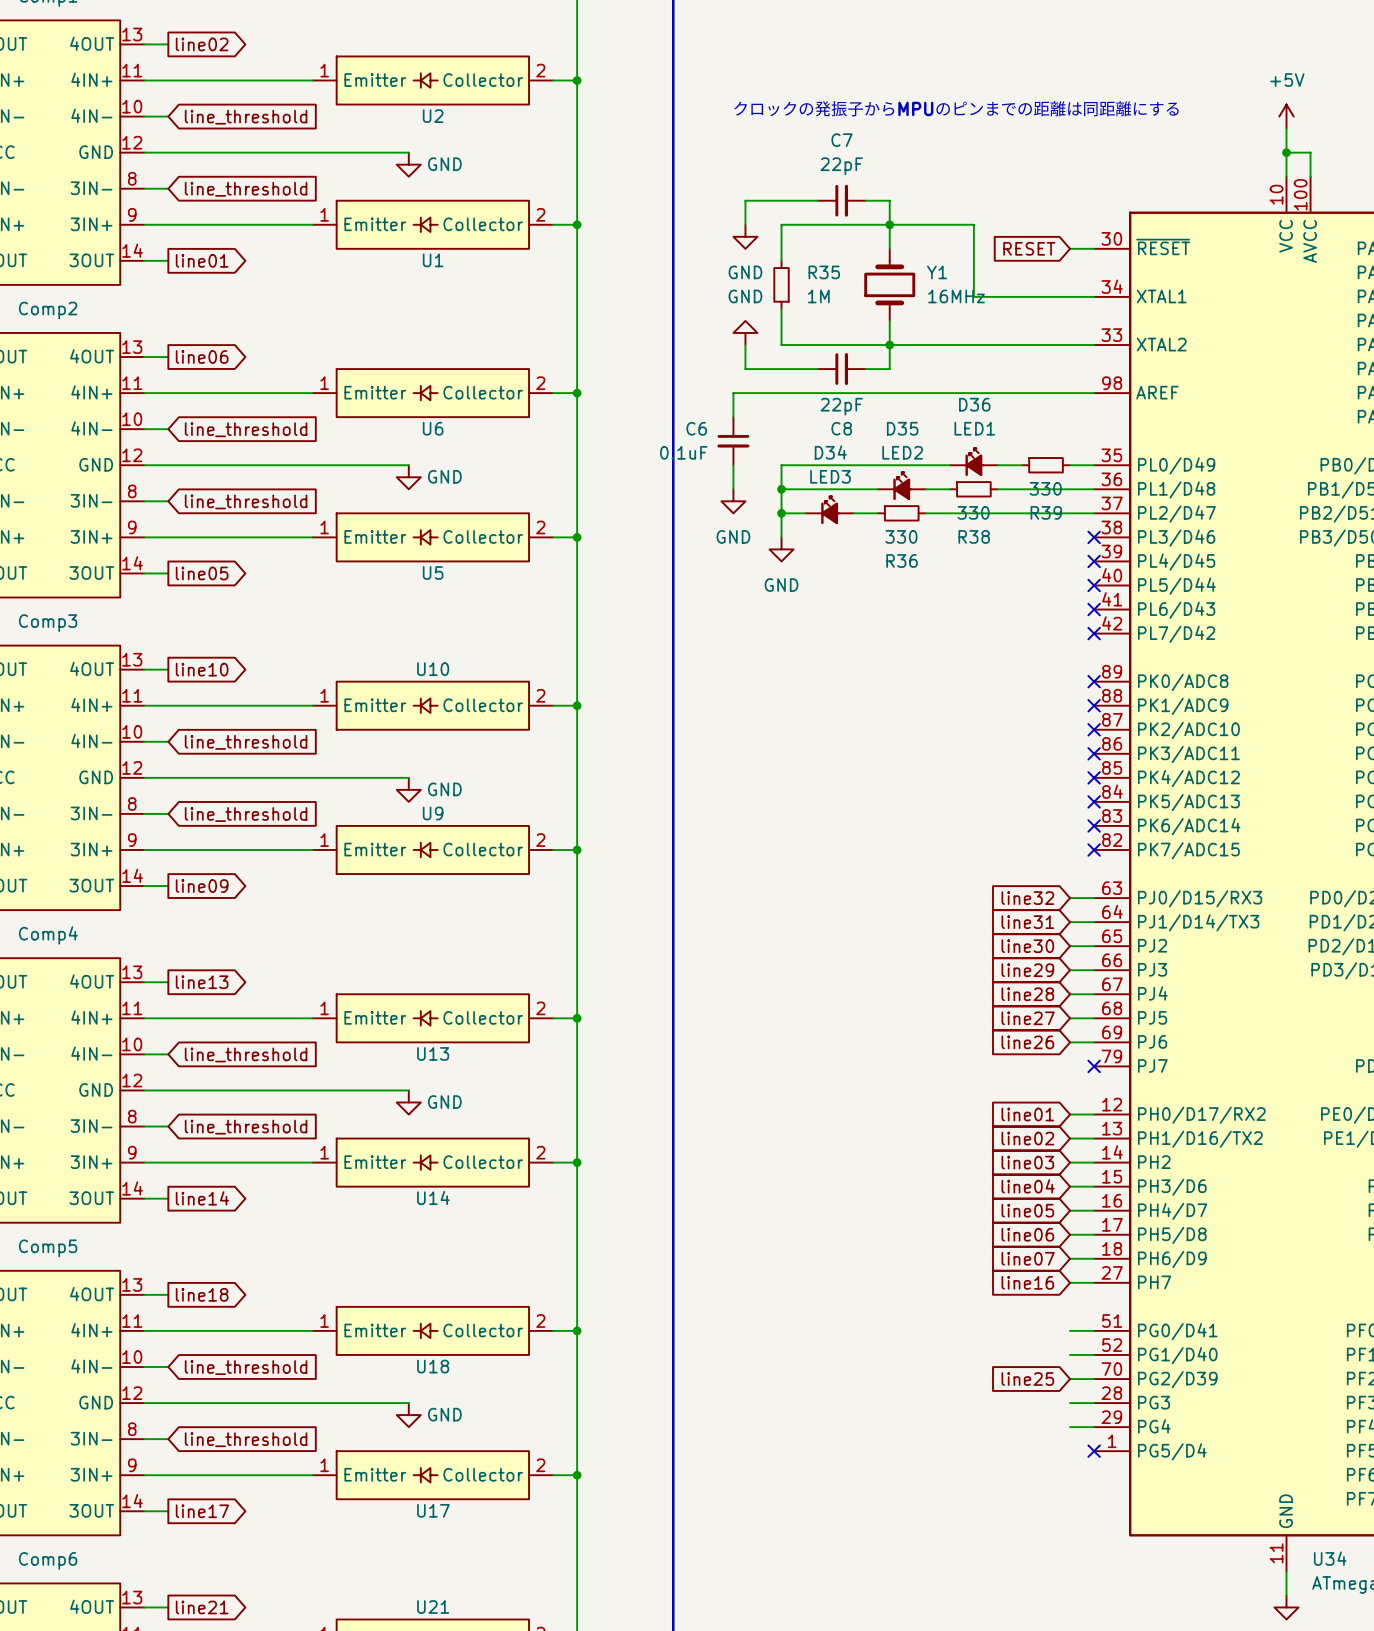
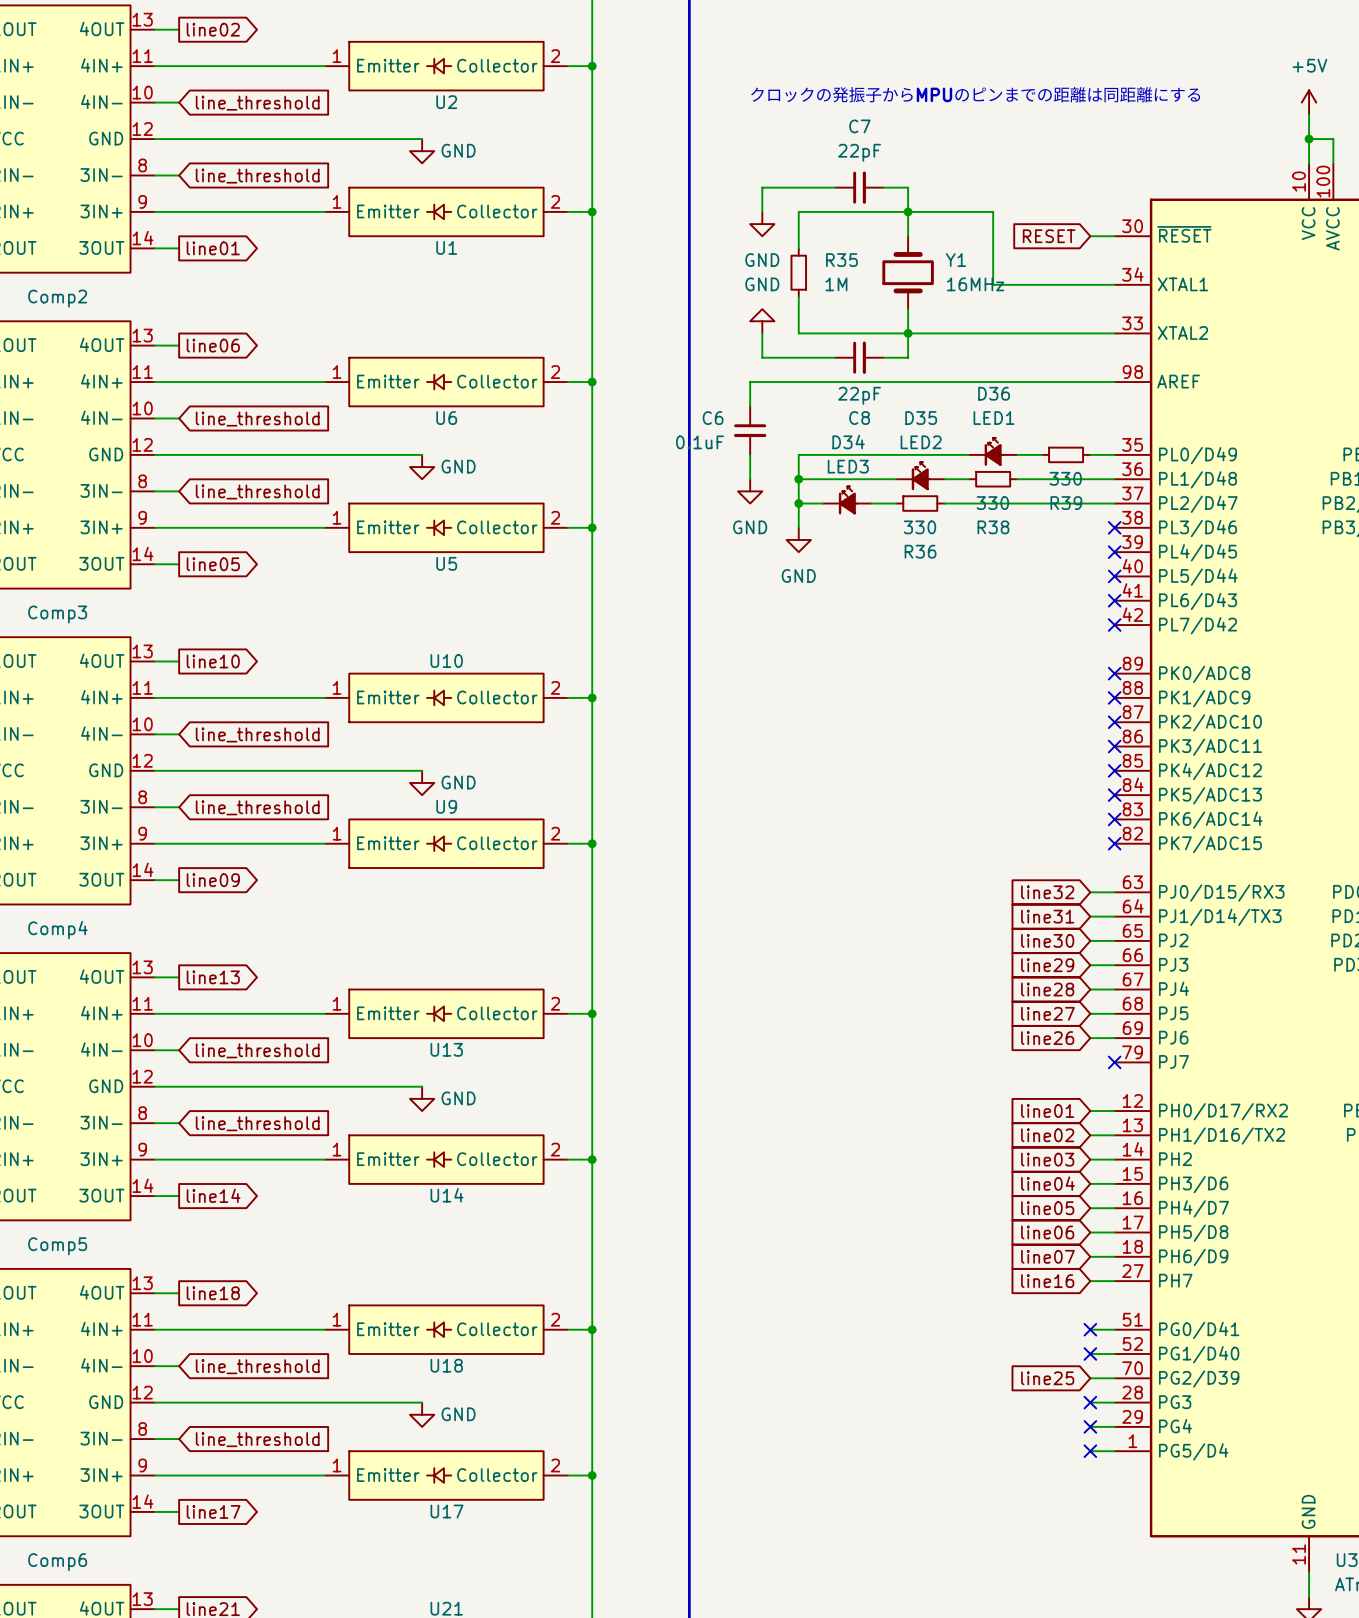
no-connect mark: none -> (1090, 1329)
no-connect mark: none -> (1090, 1354)
no-connect mark: none -> (1090, 1402)
no-connect mark: none -> (1090, 1426)
wire: none -> (1090, 1451) (1114, 1451)
no-connect mark: none -> (1090, 1451)
no-connect mark: (1094, 1451) -> none

